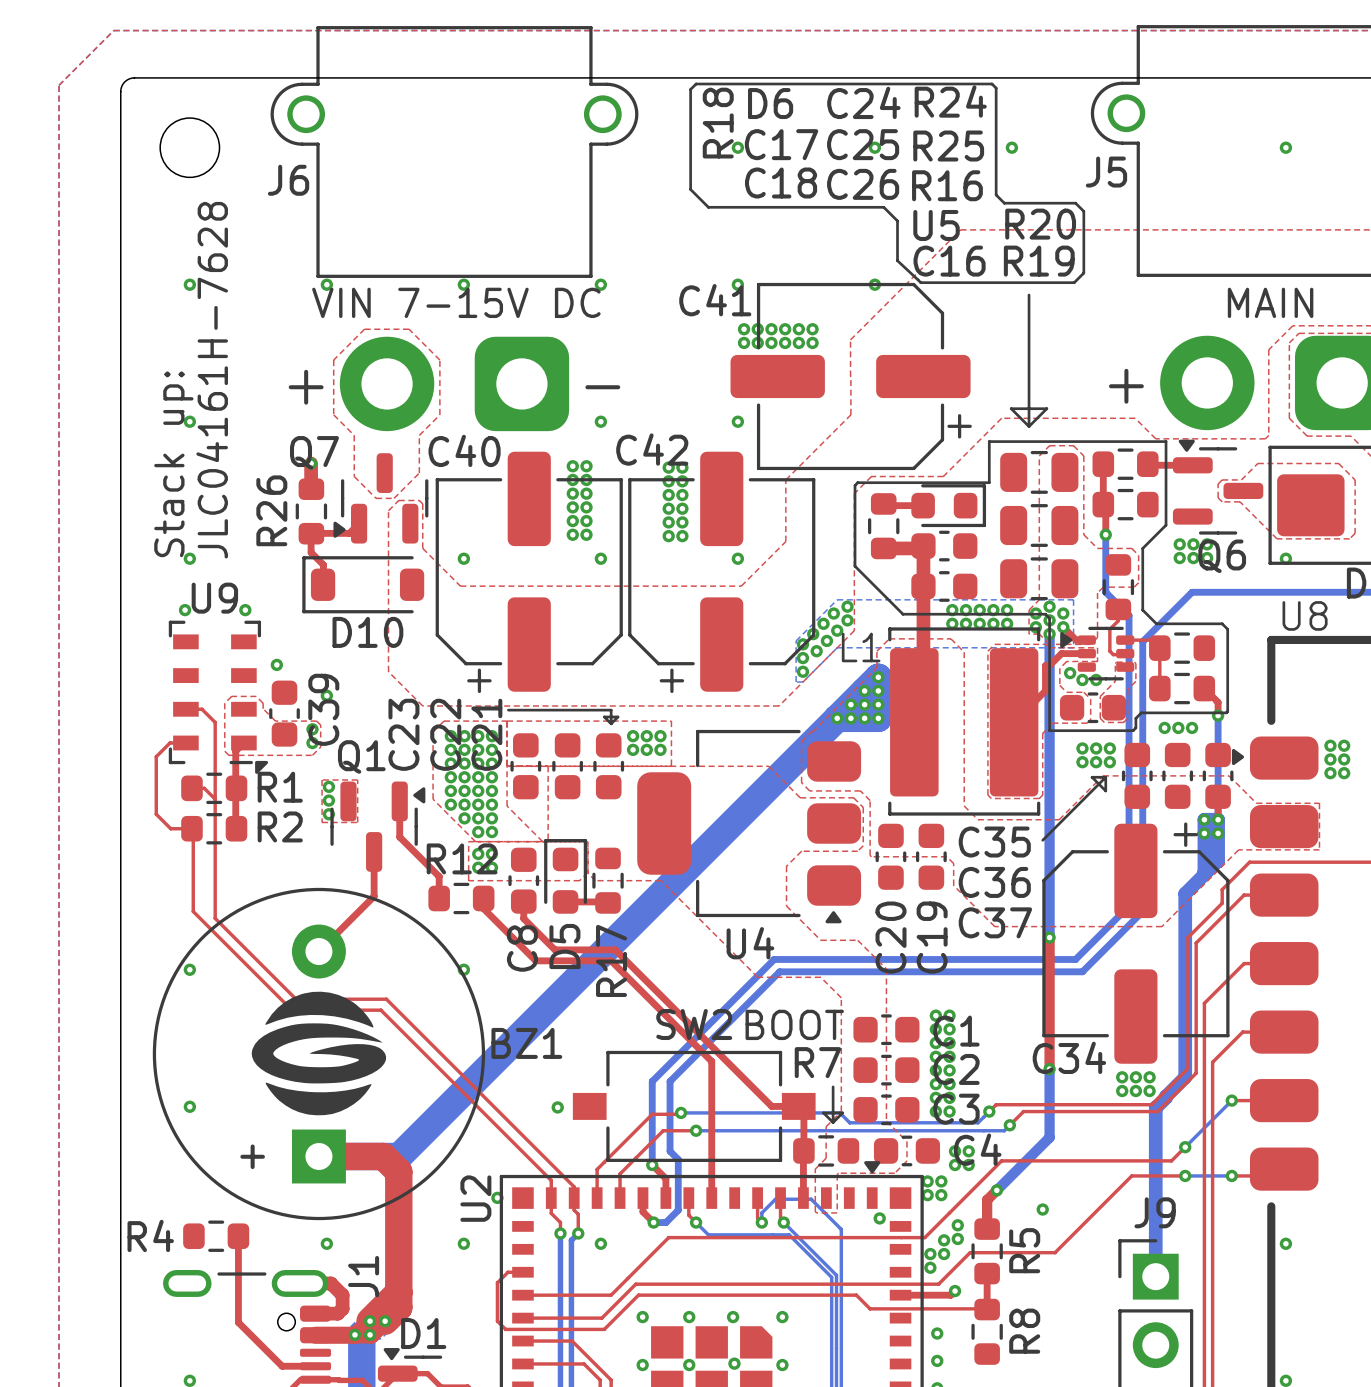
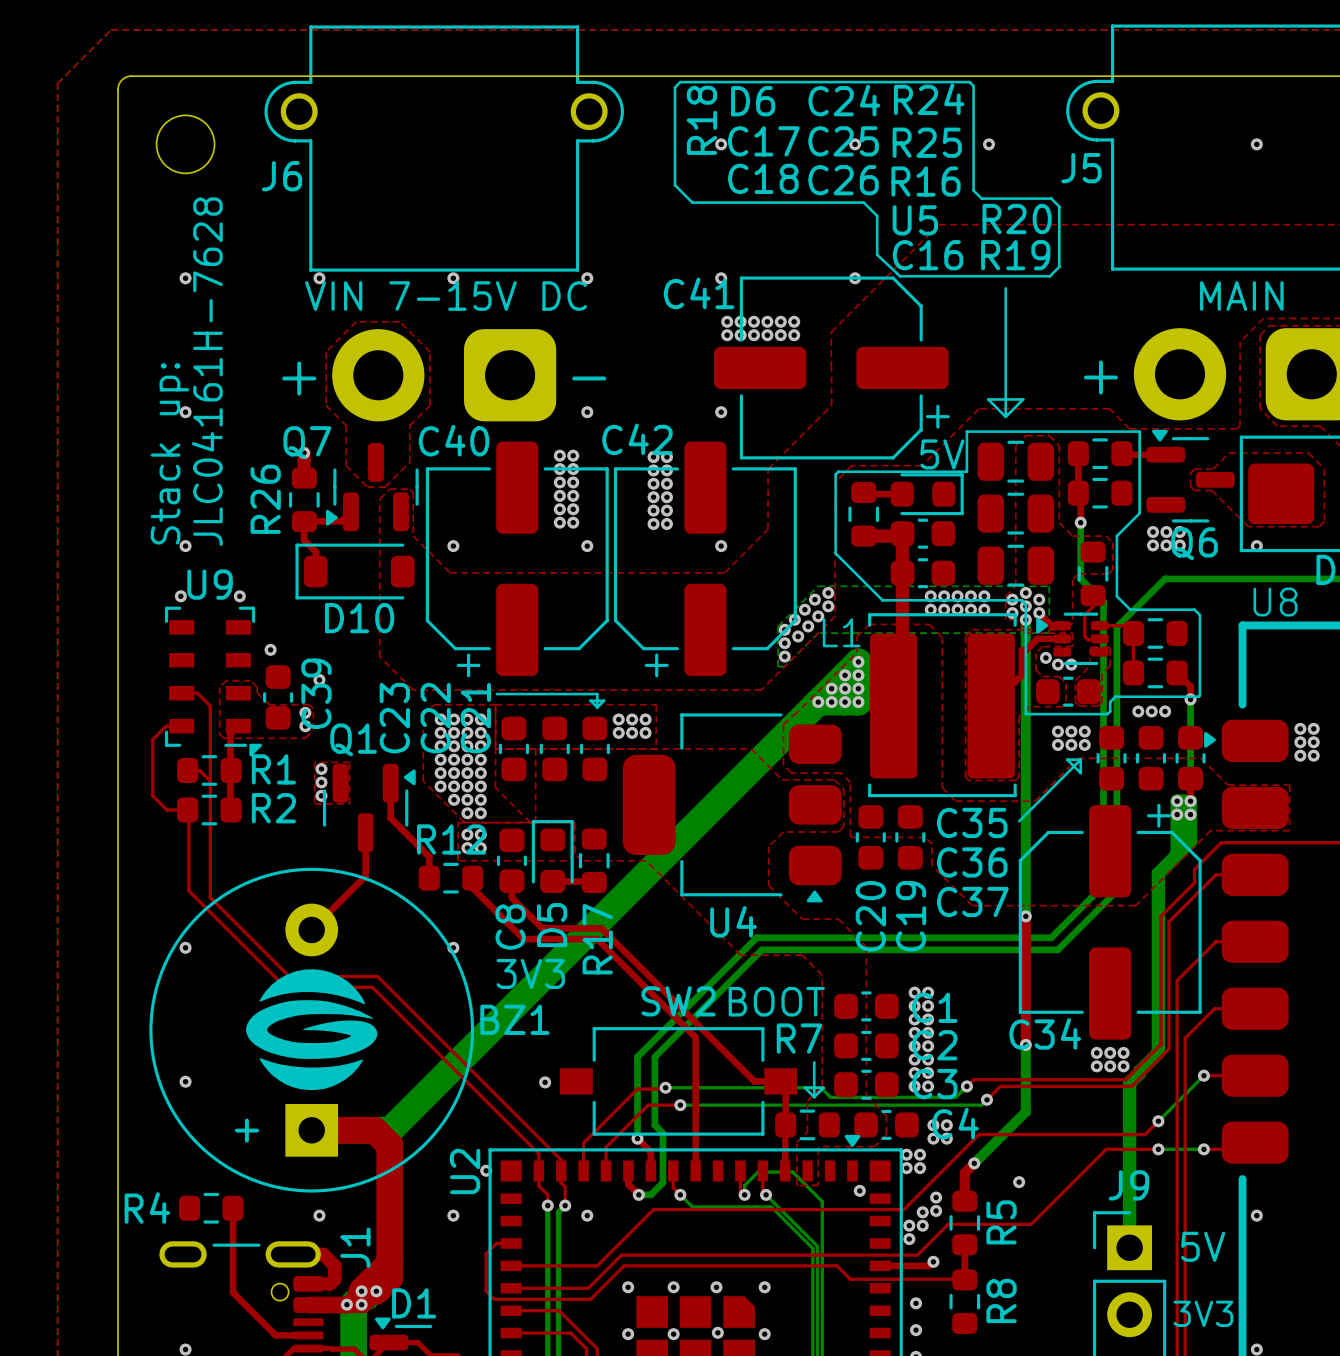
text: none -> 5V (942, 454)
text: none -> 3V3 (530, 974)
text: none -> 5V (1203, 1246)
text: none -> 3V3 (1203, 1313)

